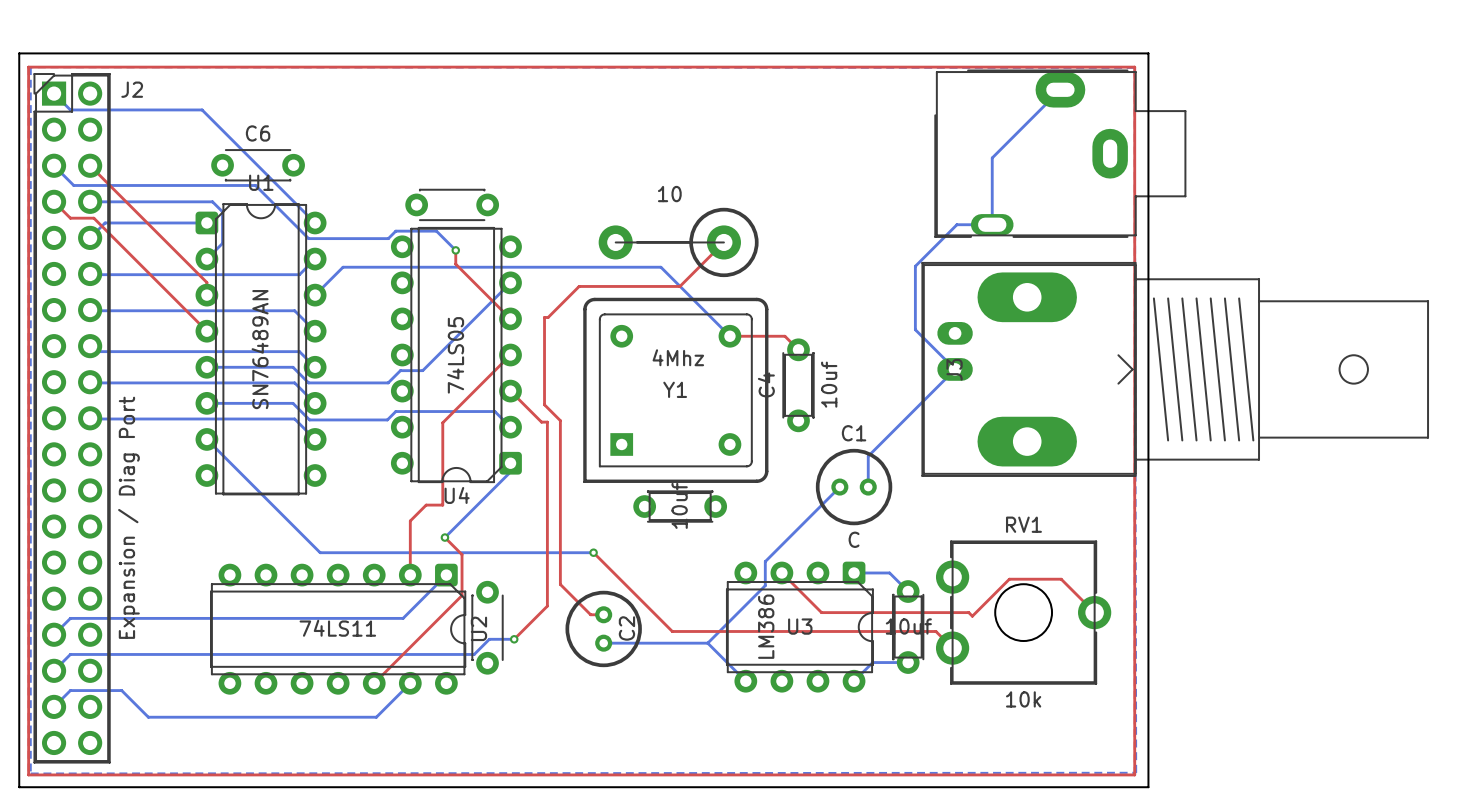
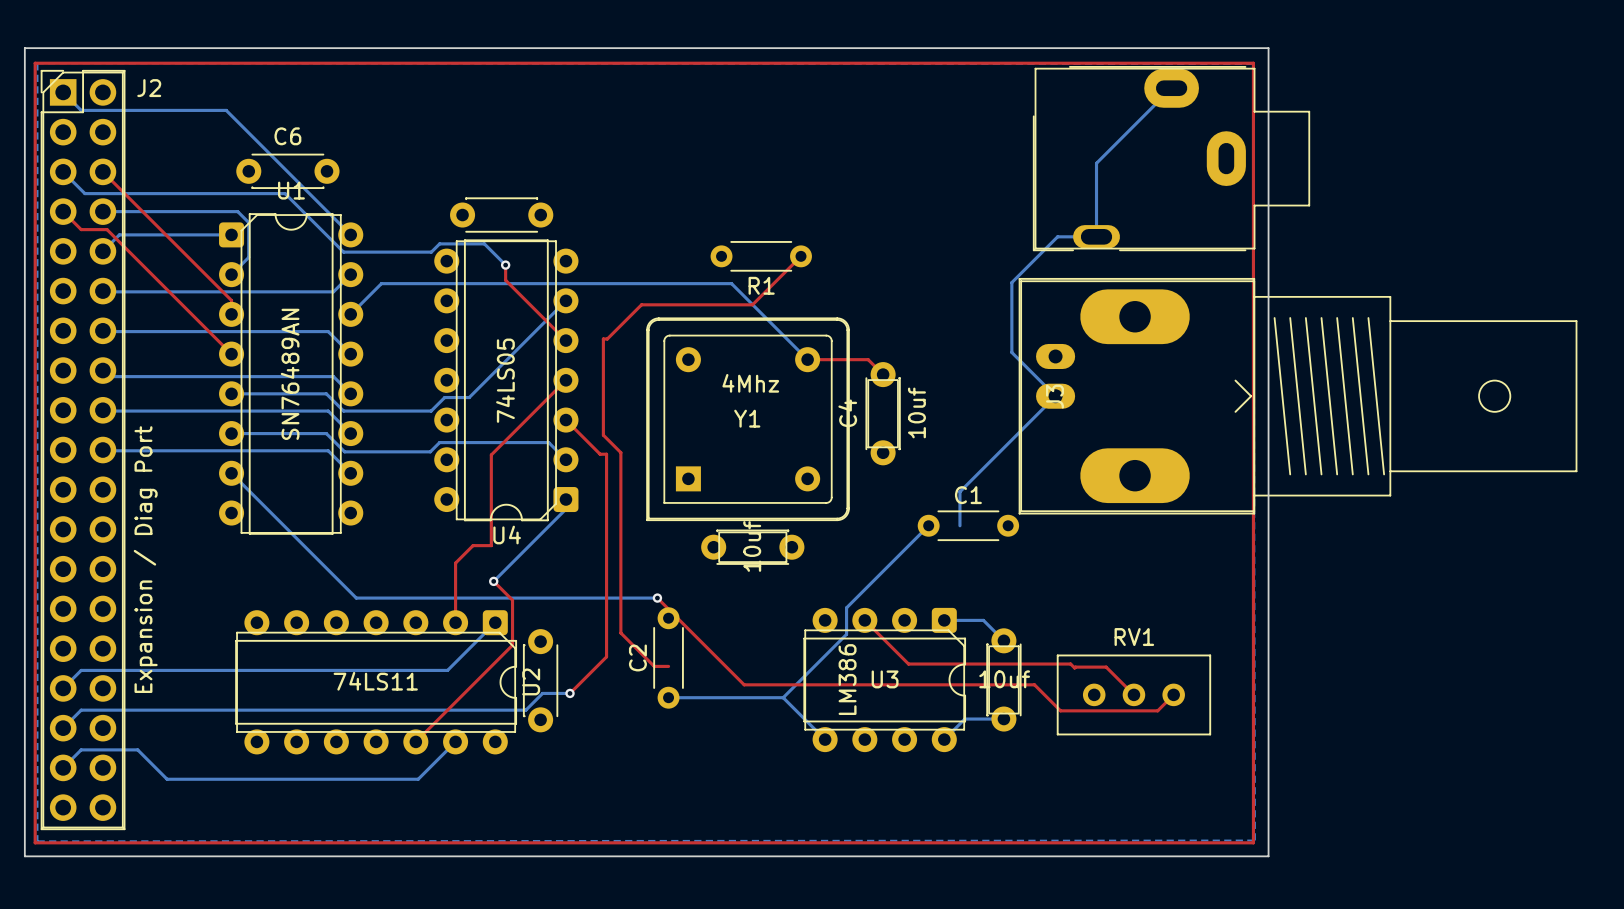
part: 10 (678, 242) -> none
R1: none -> (761, 256)
C1 footprint: [815, 448, 893, 526] -> [917, 510, 1020, 542]
RV1 name position: RV1 (1023, 524) -> RV1 (1134, 637)
C1 value: C (854, 539) -> none
RV1 footprint: [935, 540, 1112, 685] -> [1056, 654, 1212, 736]
C2 footprint: [565, 590, 642, 668] -> [653, 607, 684, 709]
top track: (1094, 612) (1061, 579) (1009, 579) (973, 615) -> (1133, 694) (1106, 667) (1075, 667)
C2 name position: C2 (626, 628) -> C2 (637, 657)
top track: none -> (1173, 694) (1157, 710) (1060, 710) (1052, 703)
RV1 value: 10k (1023, 699) -> none

